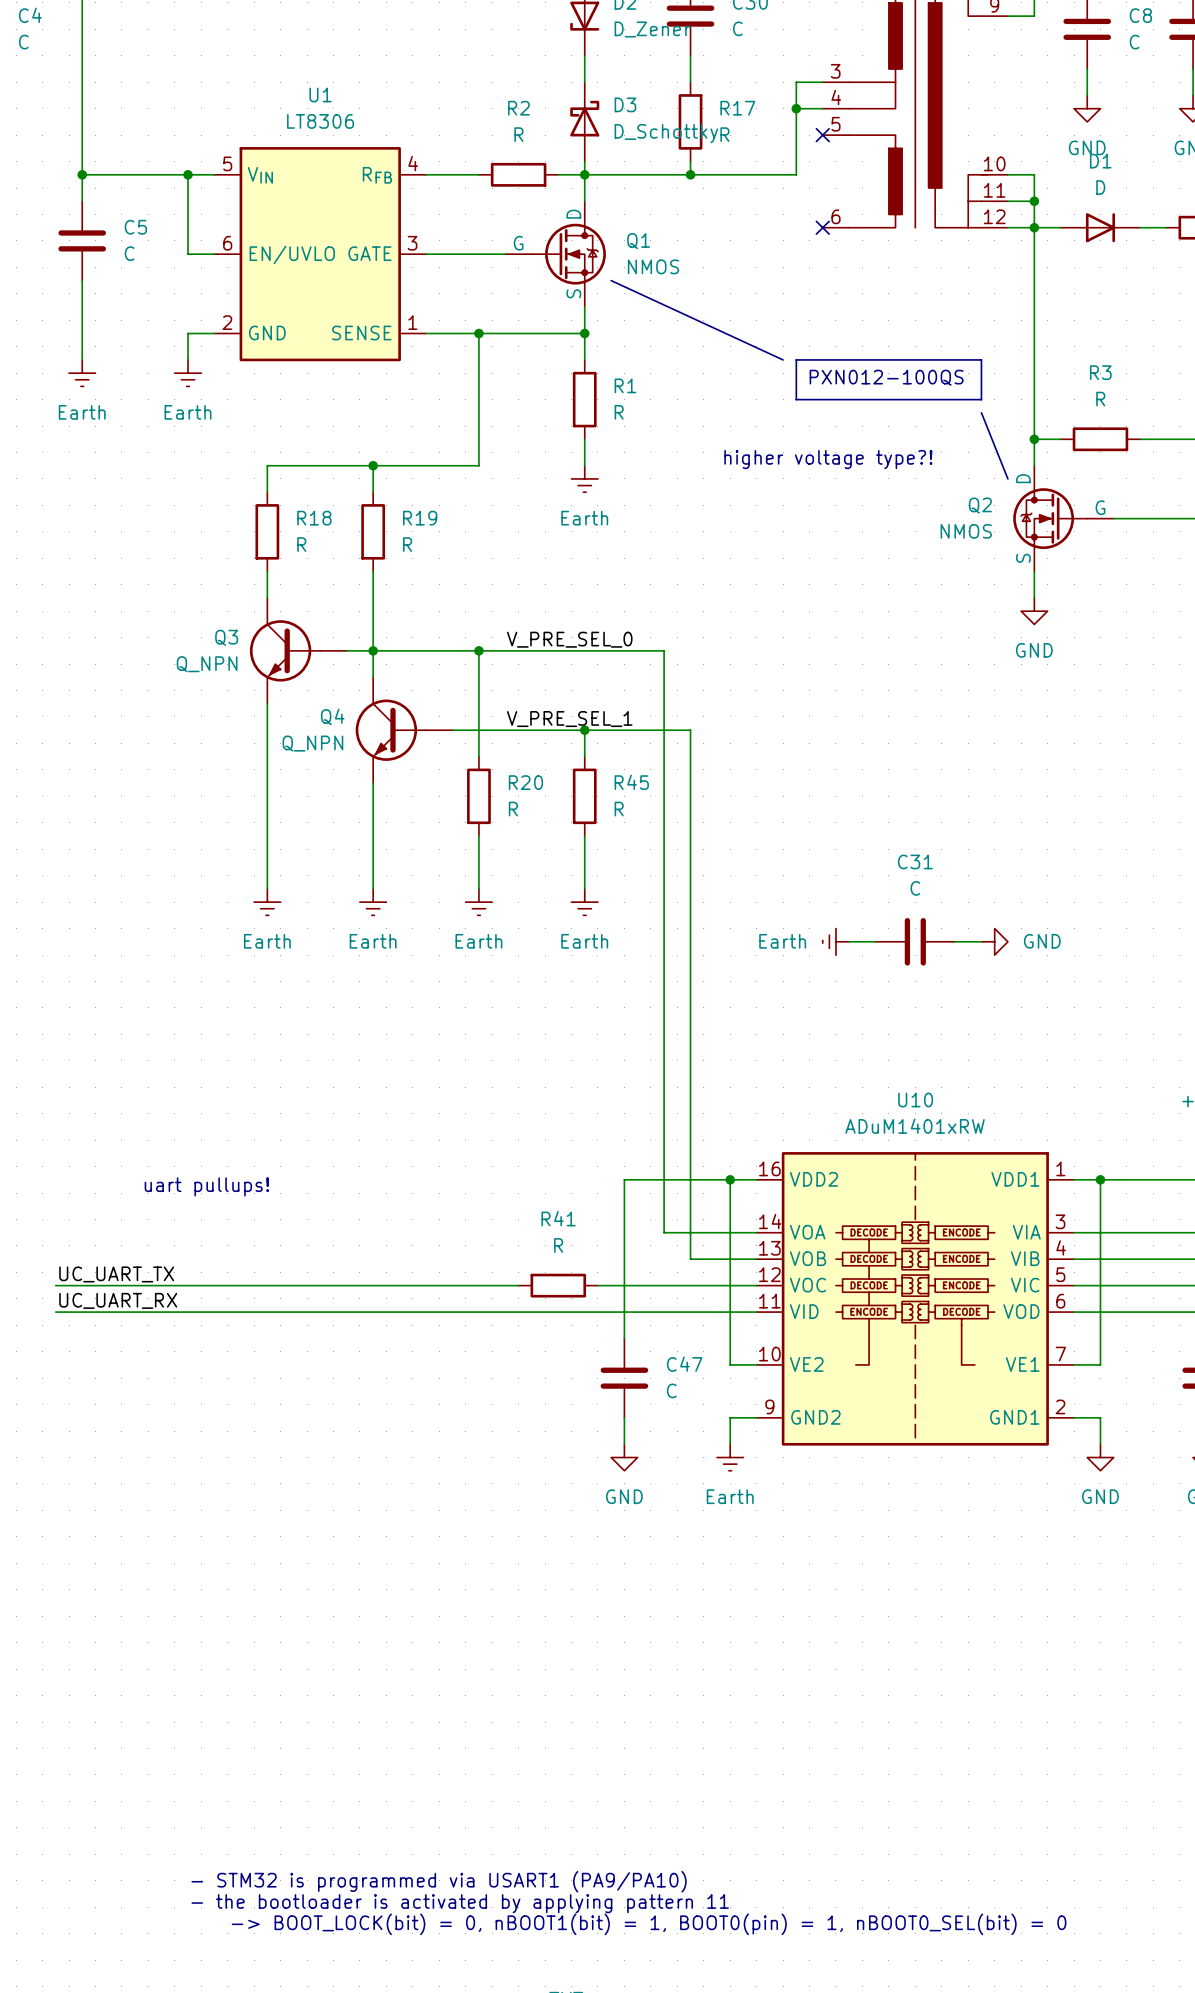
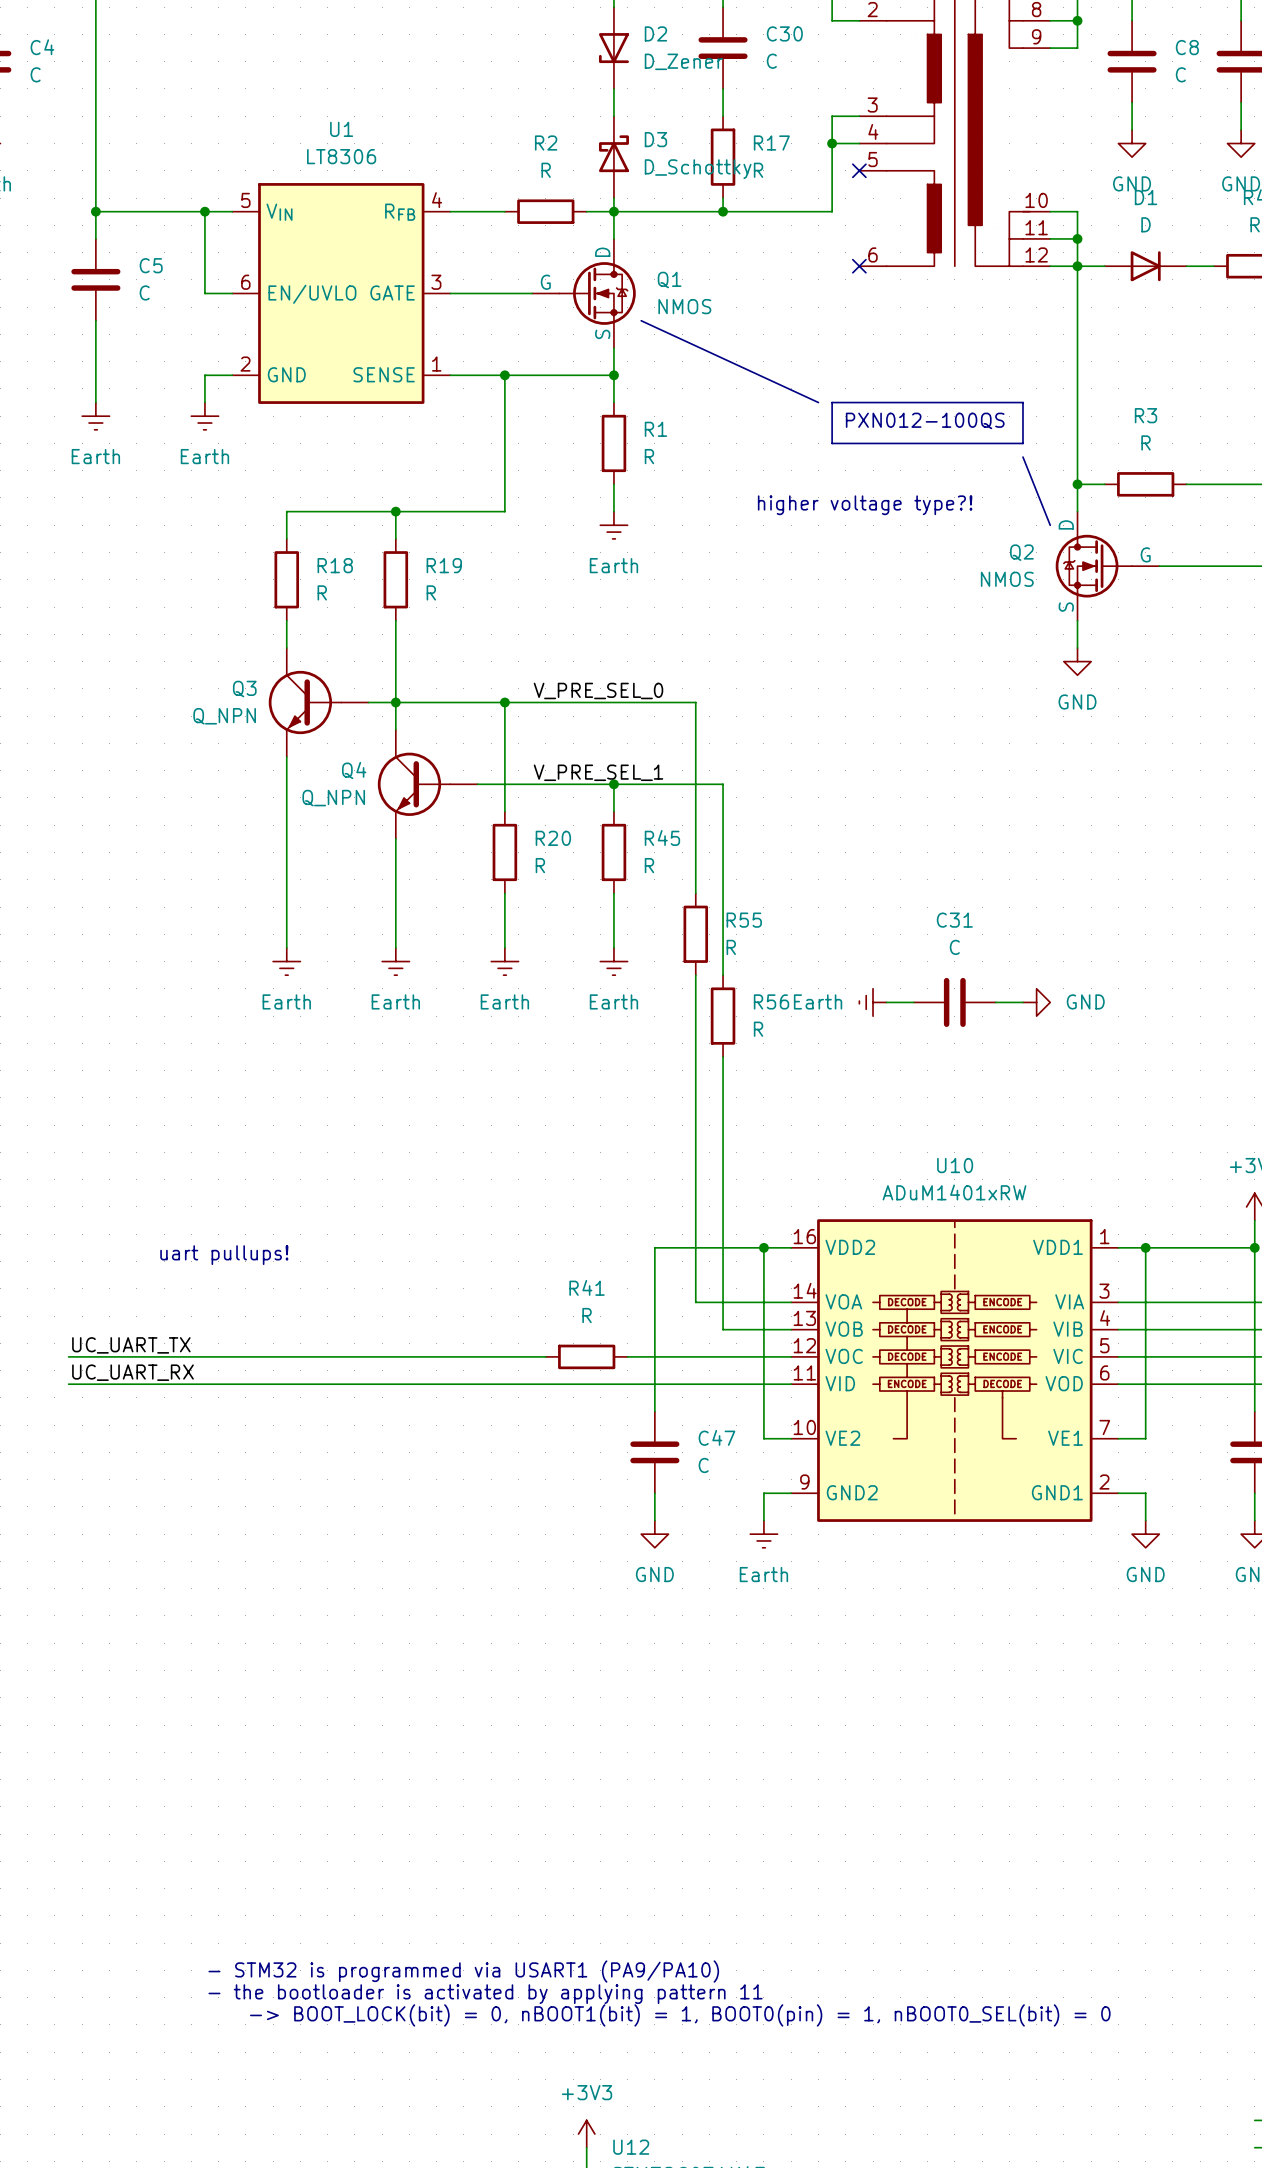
wire: (664, 836) (664, 915) -> none
R55: none -> R (695, 934)
wire: (690, 915) (690, 994) -> none
R56: none -> R (723, 1016)

